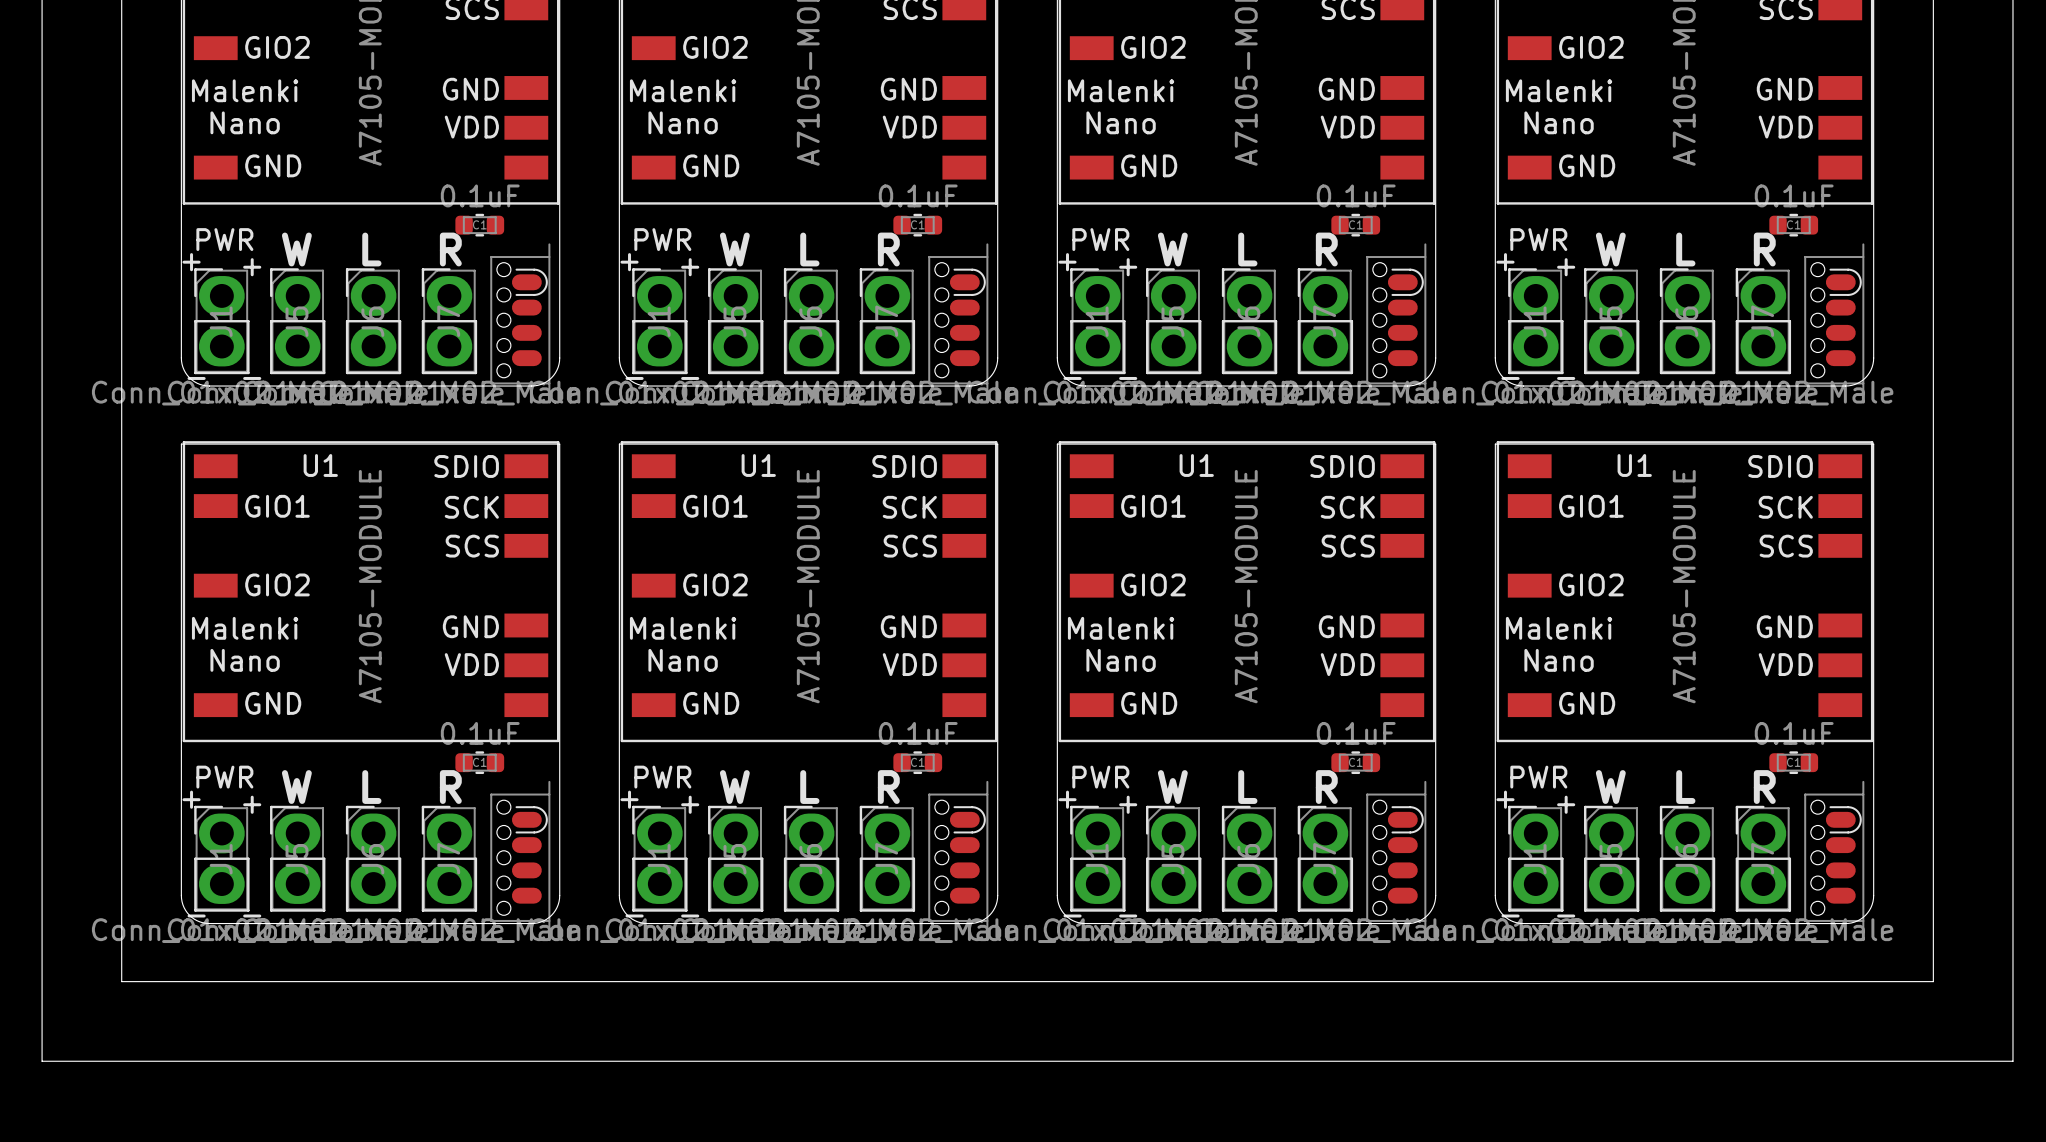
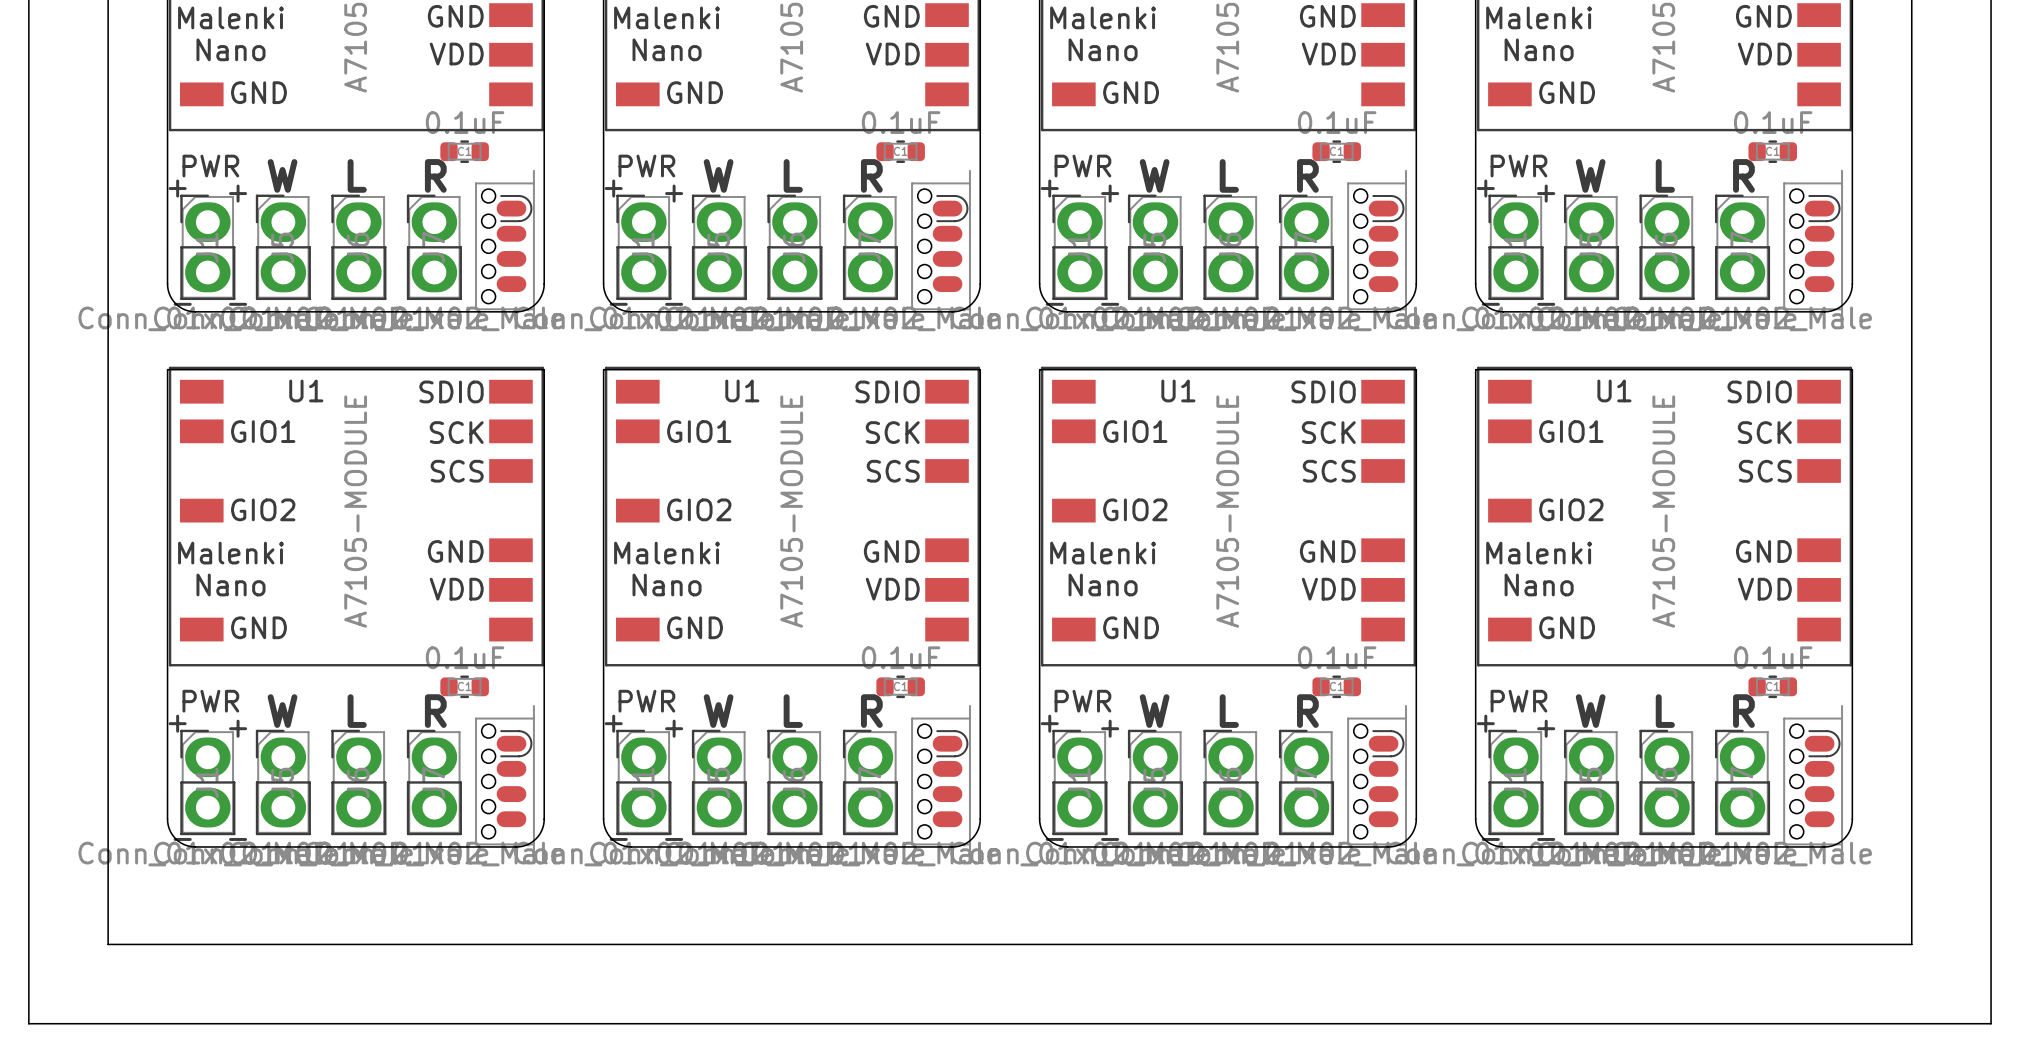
board edge: (121, 981) (1933, 981) -> (108, 904) (108, 944) (1911, 944) (1911, 904)
board edge: (42, 1061) (2012, 1061) -> (28, 984) (28, 1023) (1991, 1023) (1991, 984)

